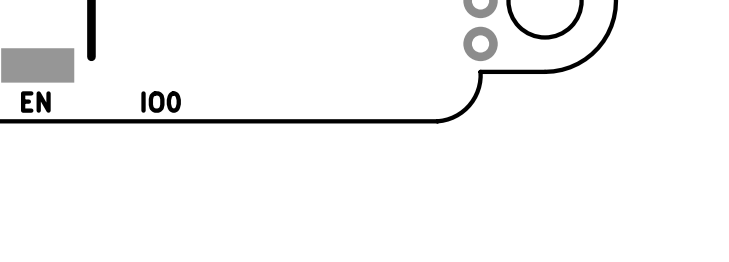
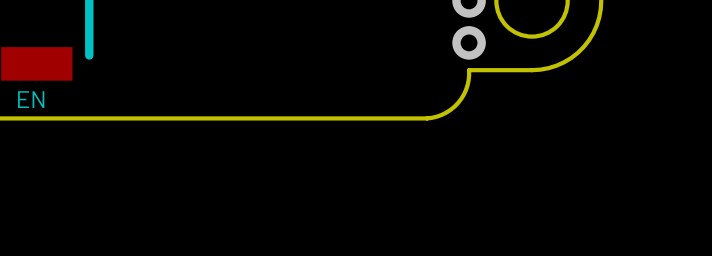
text: IO0 (161, 102) -> none

